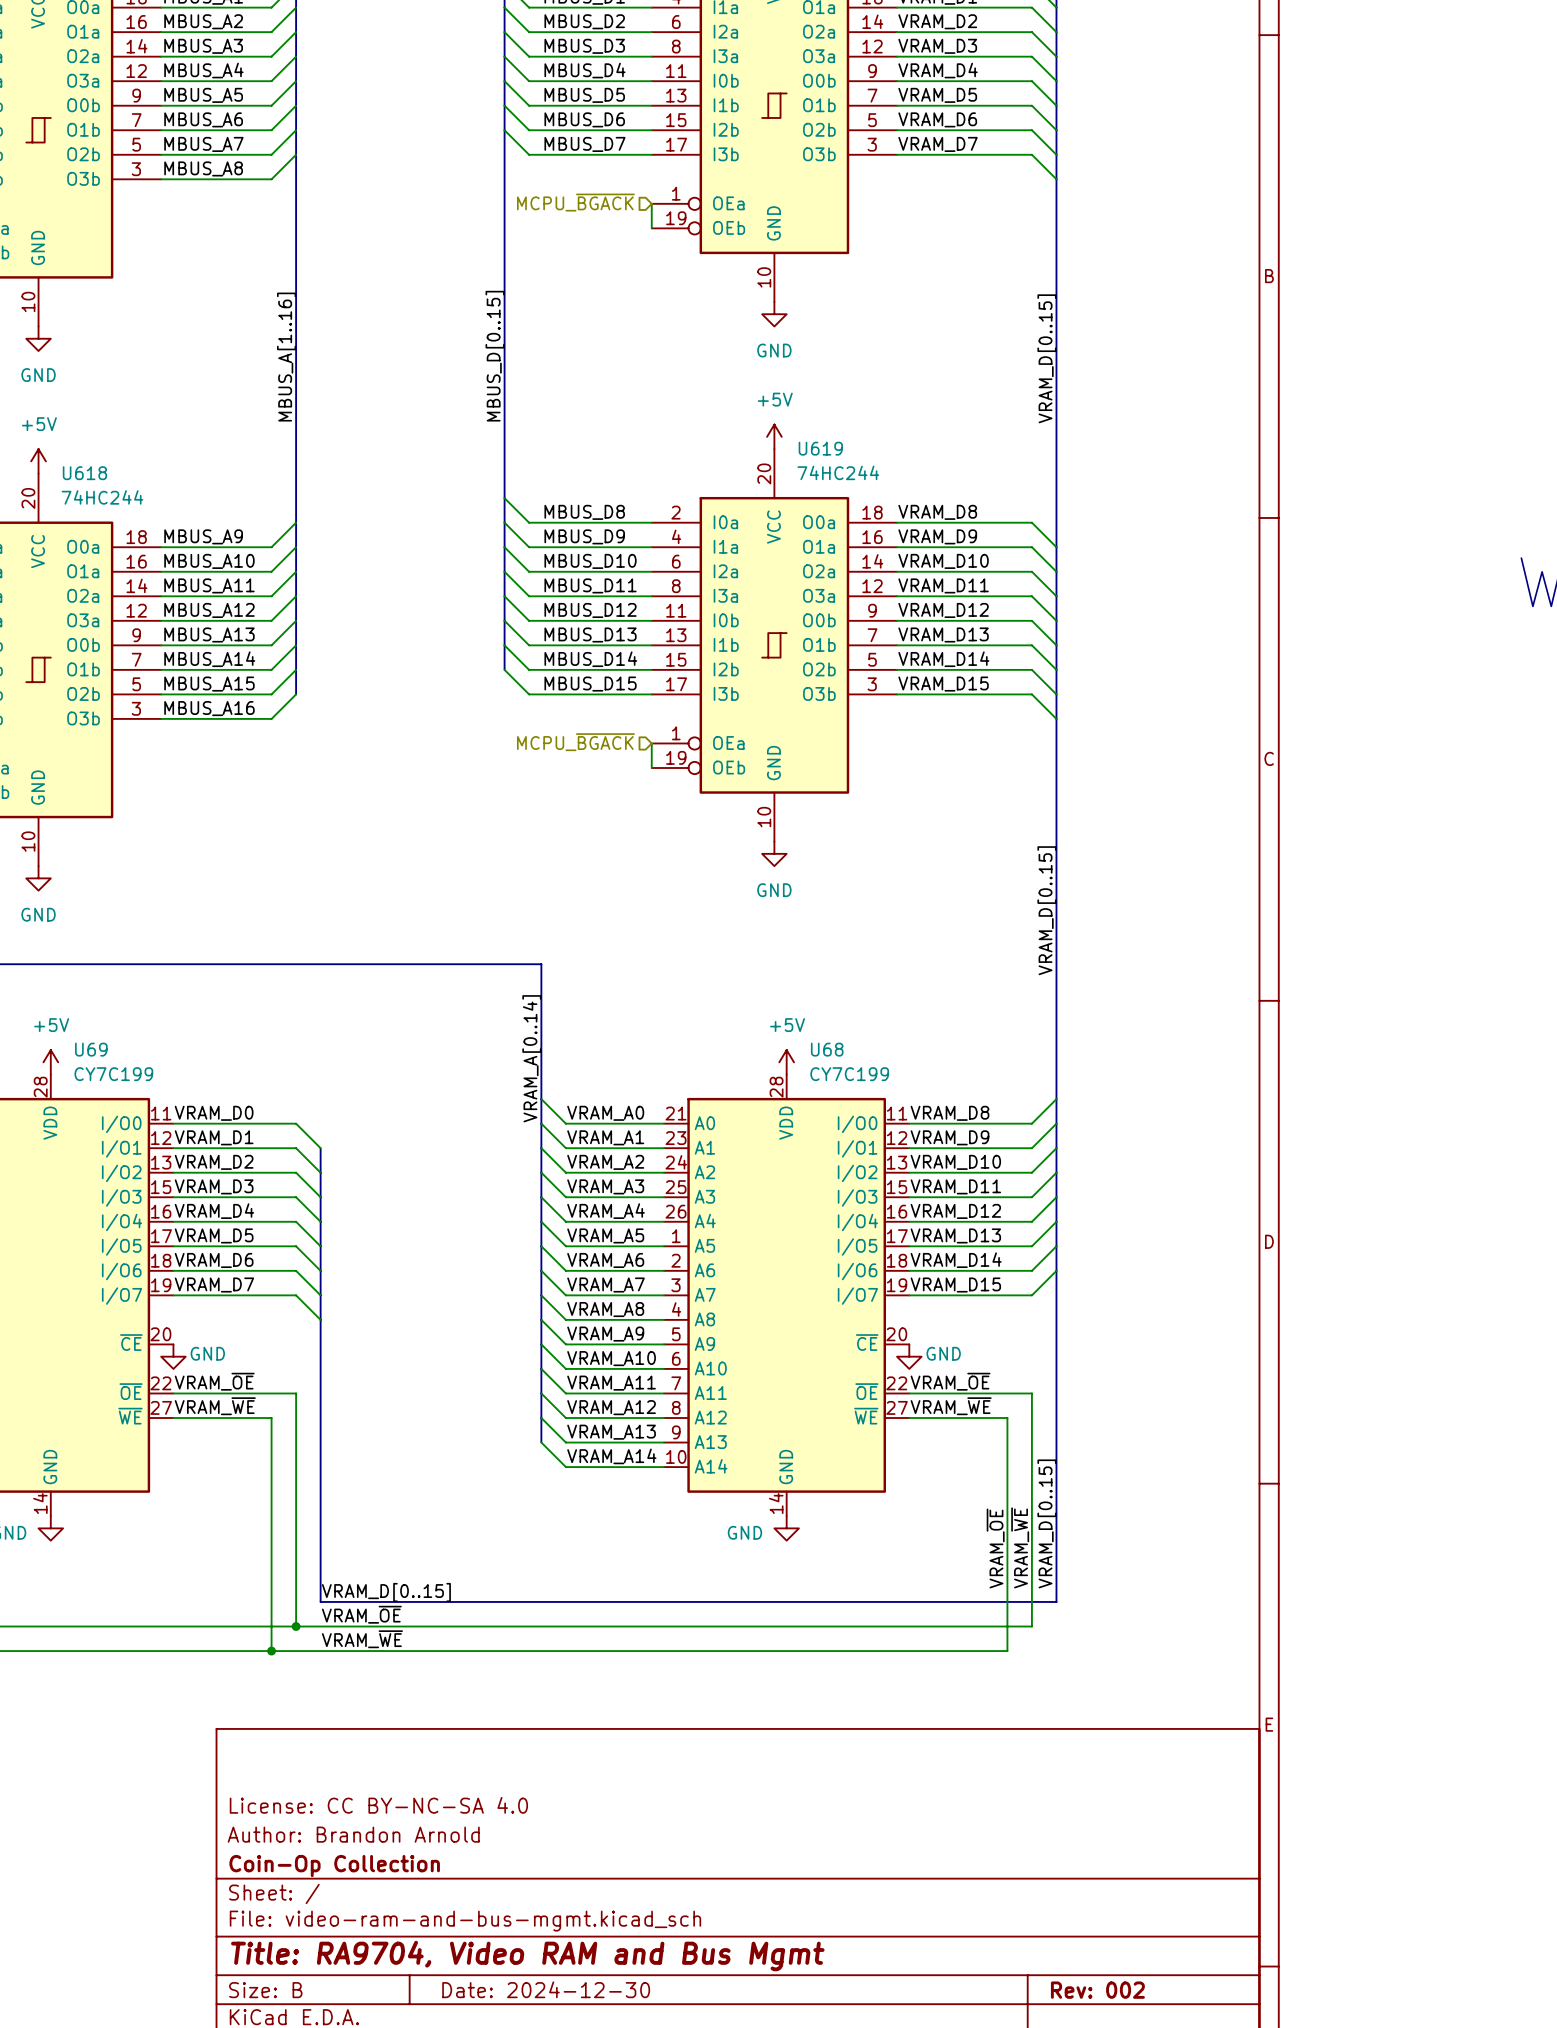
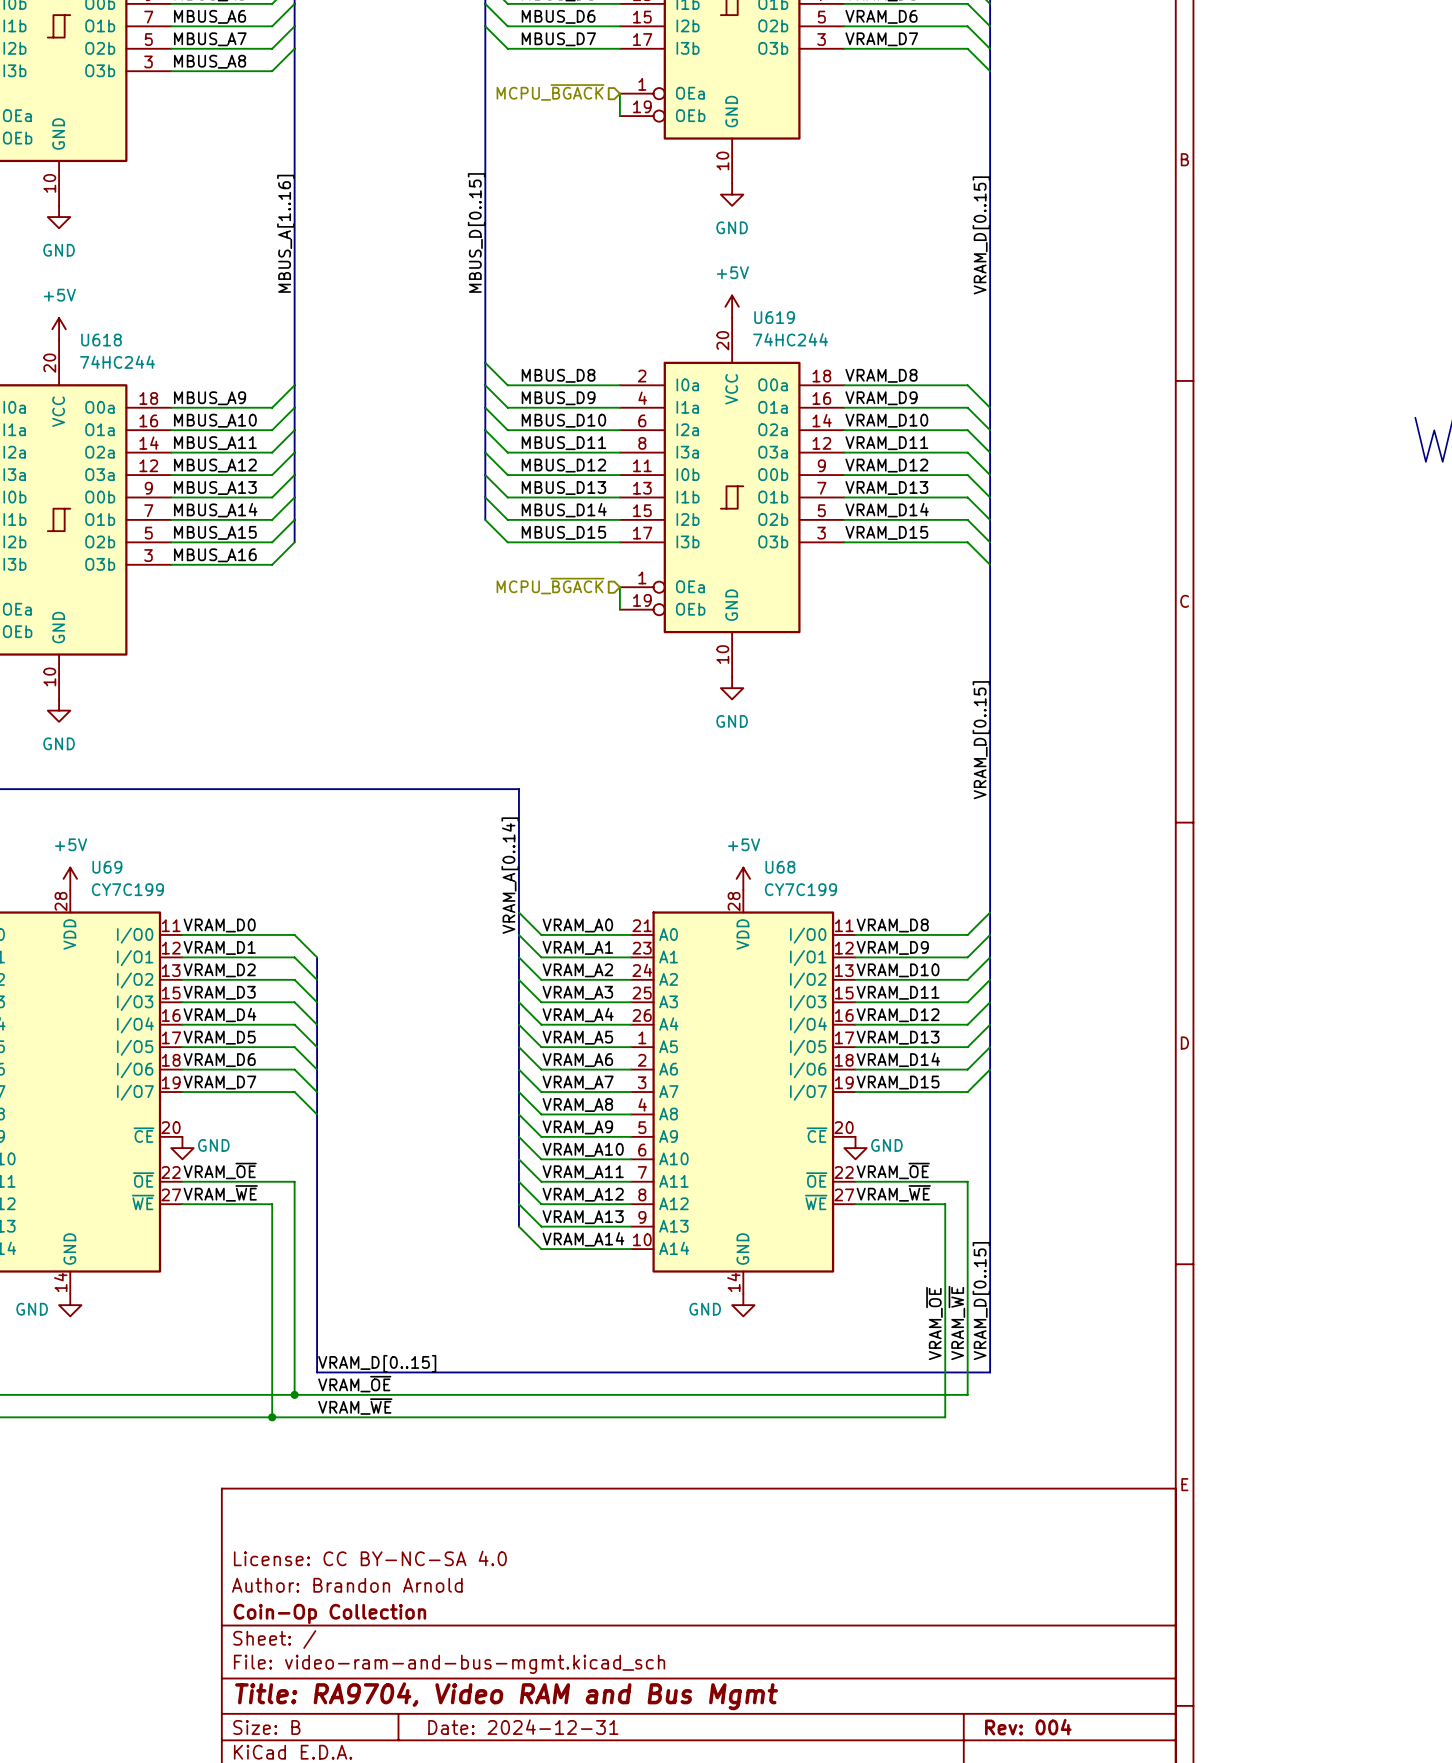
title block: Date: 2024-12-30 (546, 1989) -> Date: 2024-12-31 (523, 1727)
title block: Rev: 002 (1097, 1990) -> Rev: 004 (1028, 1727)

